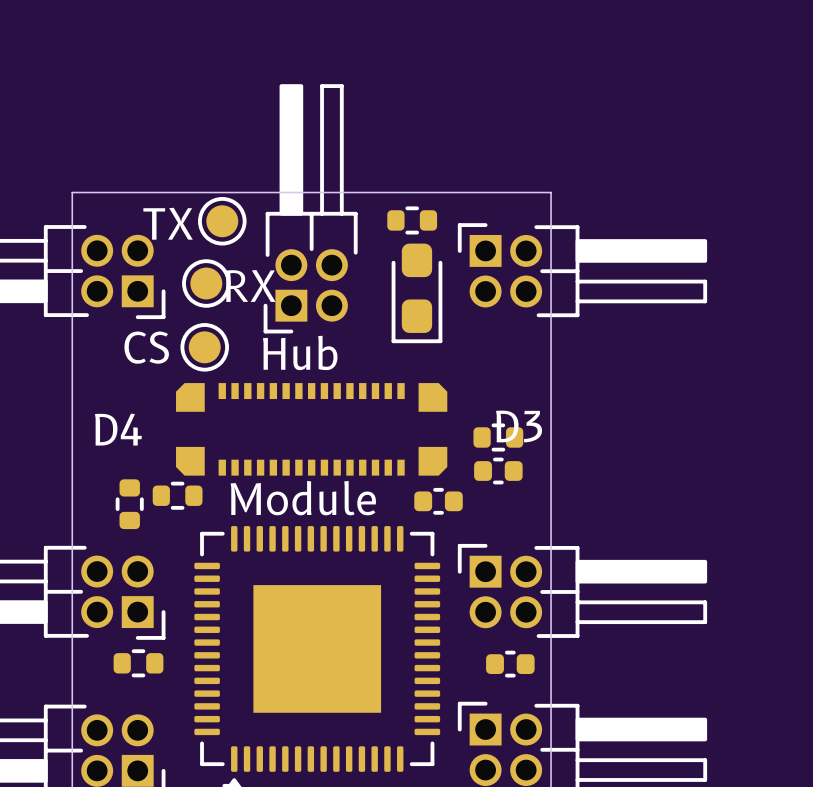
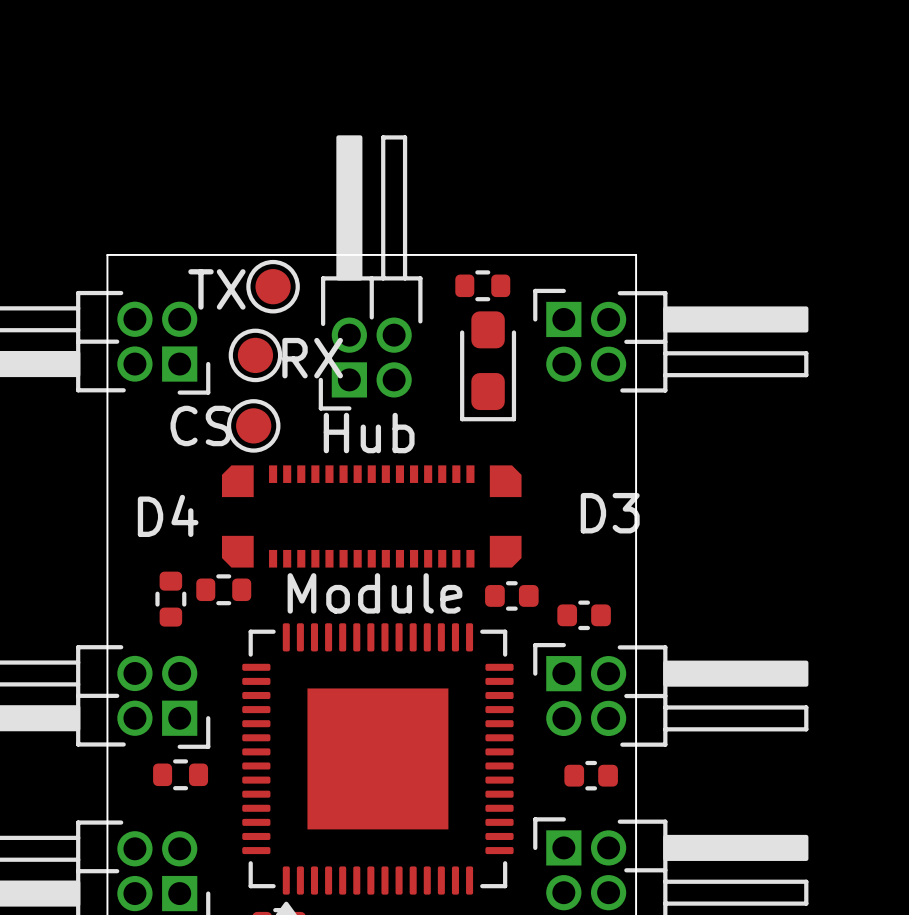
part: (498, 437) -> none
part position: (498, 471) -> (584, 615)

